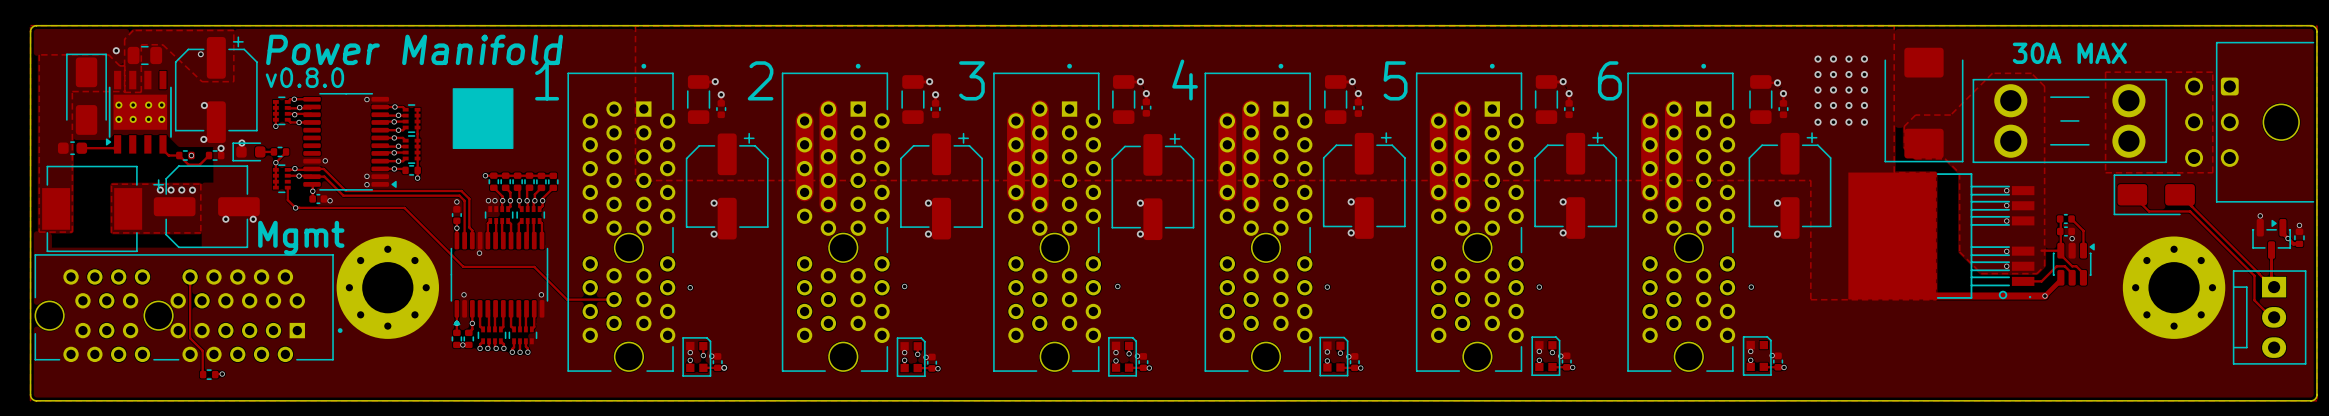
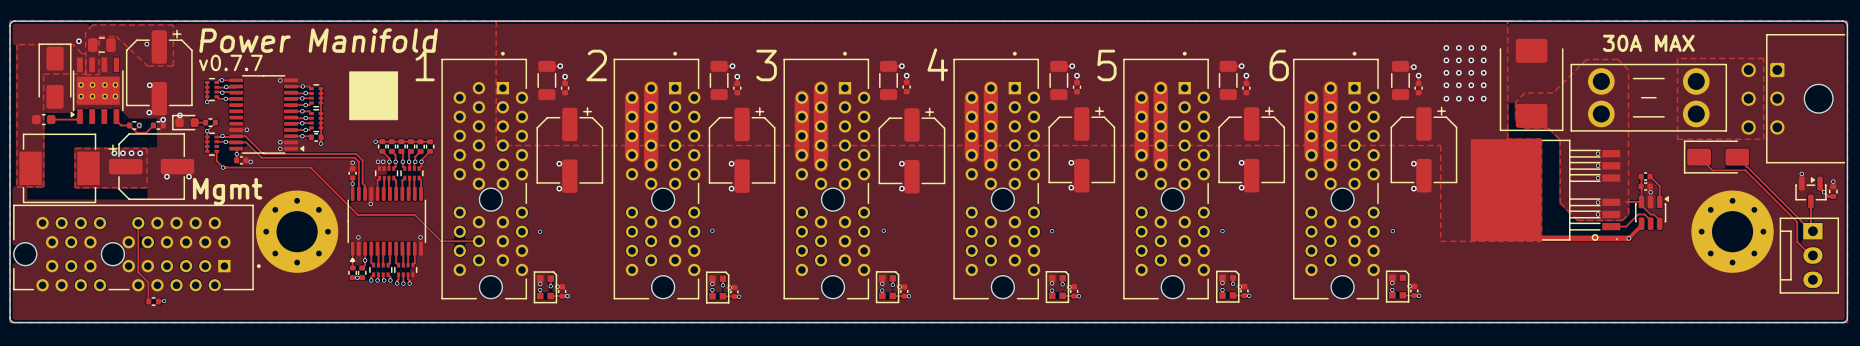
text: v0.8.0 (304, 77) -> v0.7.7 (230, 62)

